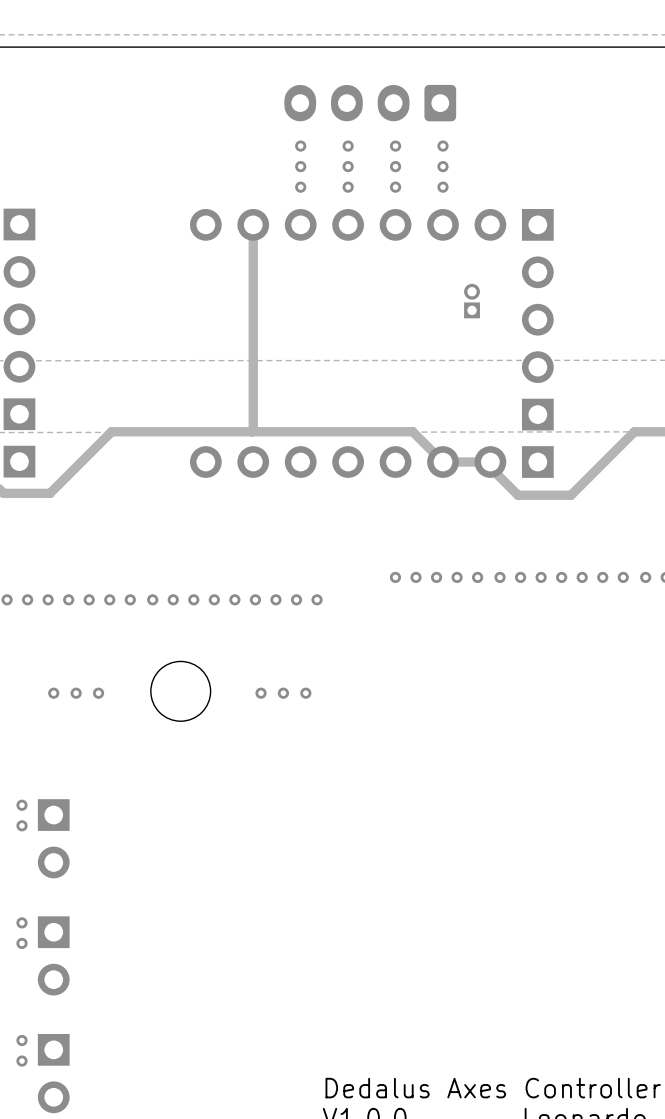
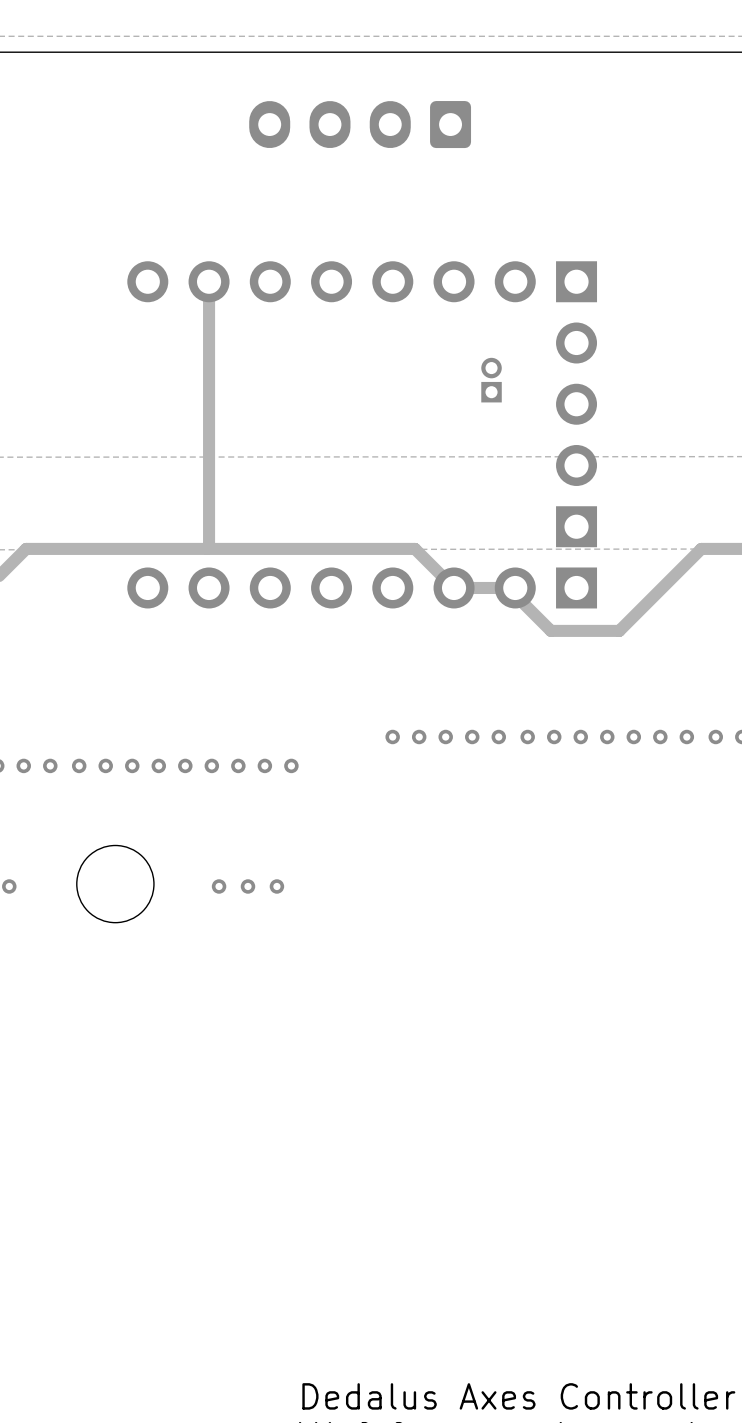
via: (300, 146) -> none
via: (348, 146) -> none
via: (395, 146) -> none
via: (442, 146) -> none
via: (300, 166) -> none
via: (348, 166) -> none
via: (395, 166) -> none
via: (442, 166) -> none
via: (300, 187) -> none
via: (348, 187) -> none
via: (395, 187) -> none
via: (442, 187) -> none

